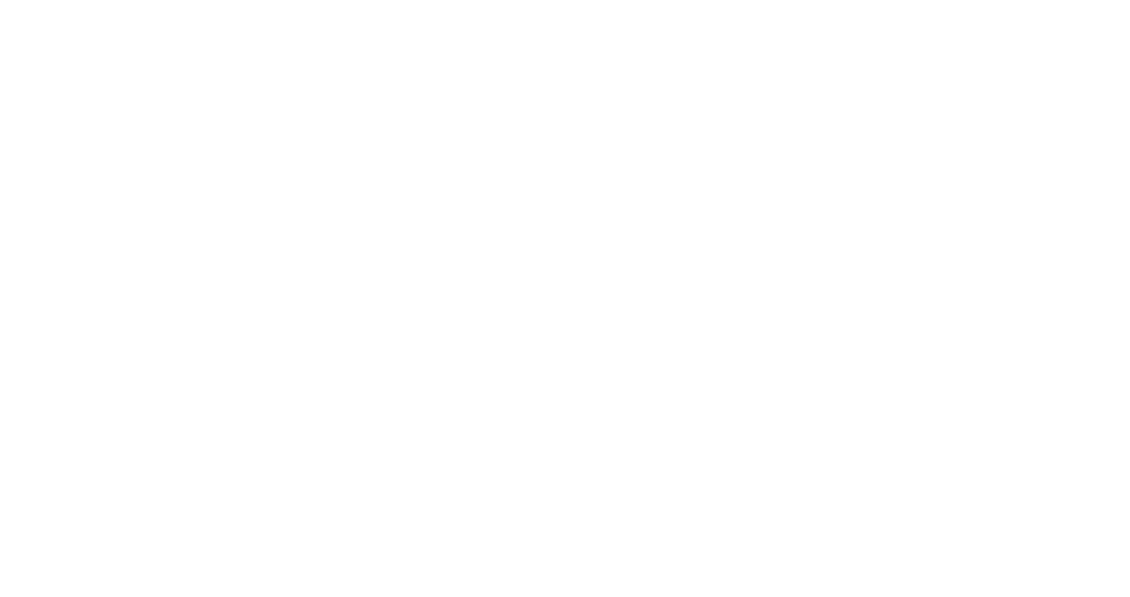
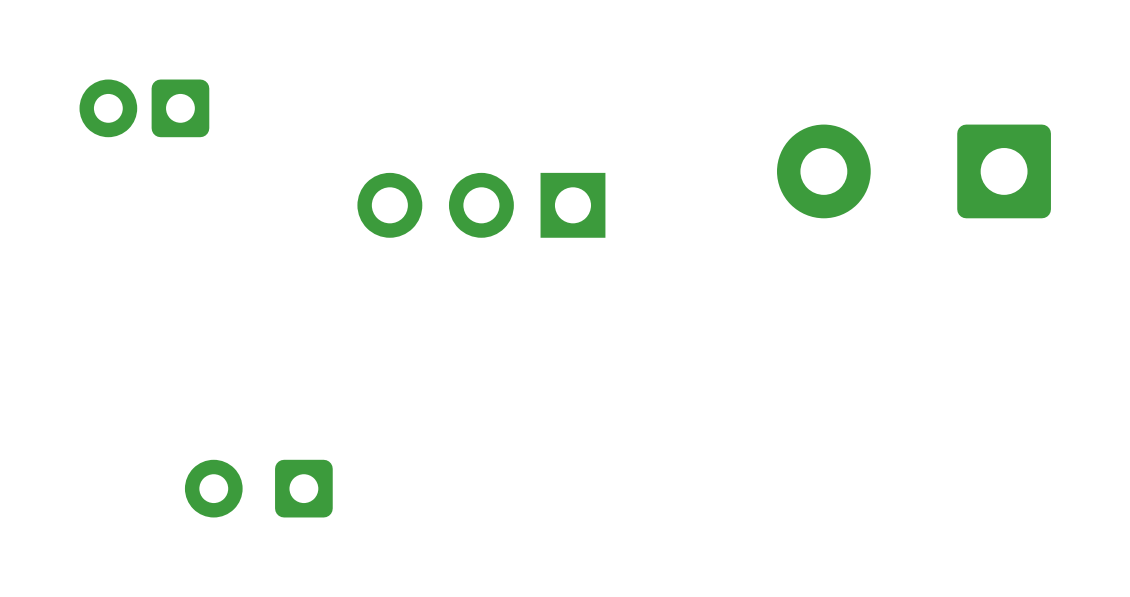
part: none -> (144, 108)
part: none -> (913, 171)
part: none -> (481, 205)
part: none -> (258, 488)

